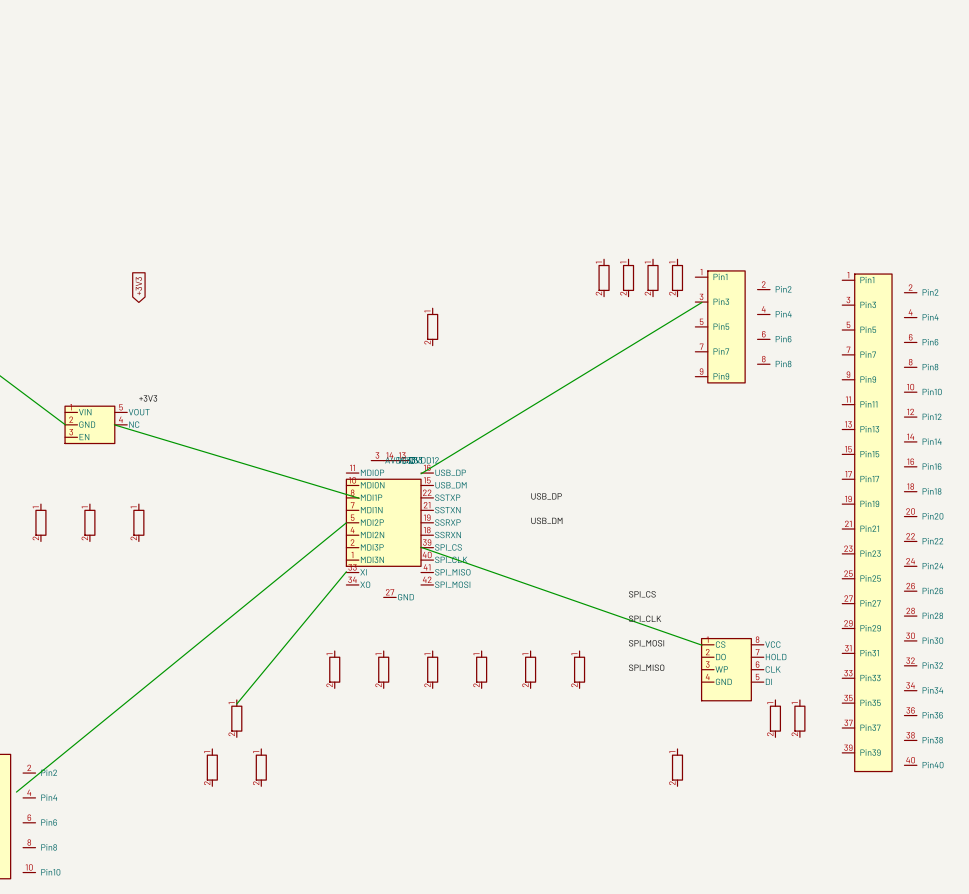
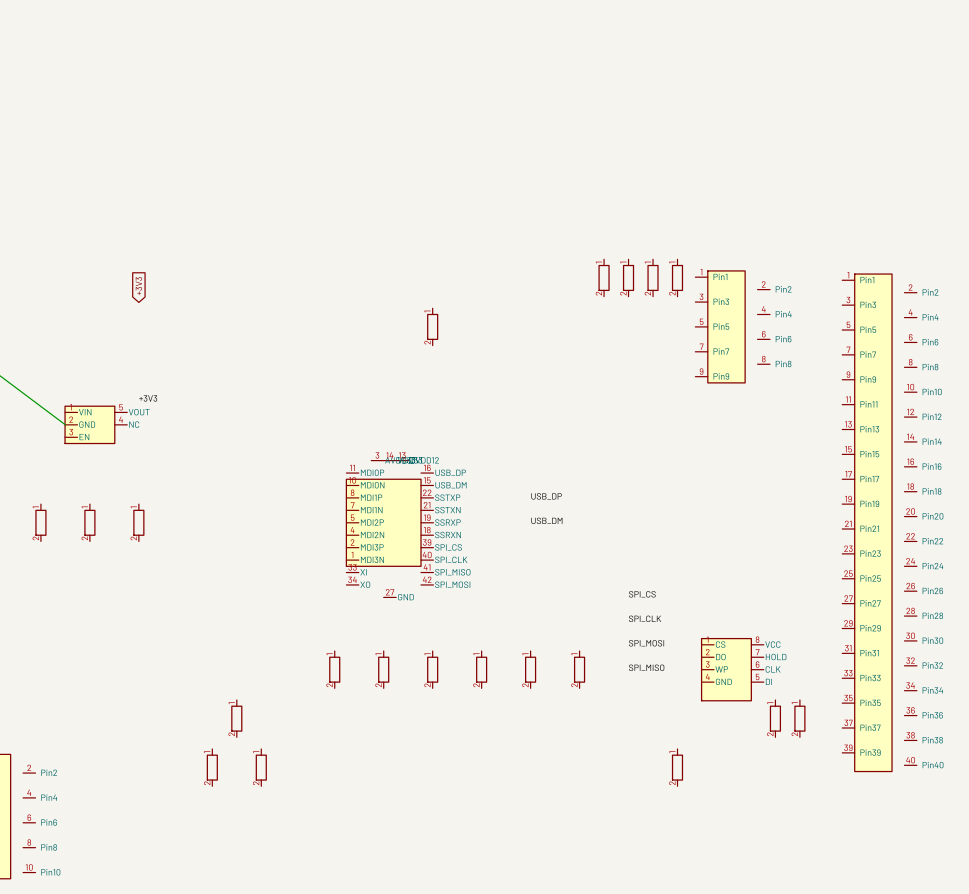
wire: (701, 302) (421, 473) -> none
wire: (114, 424) (359, 498) -> none
wire: (346, 522) (16, 792) -> none
wire: (421, 547) (701, 645) -> none
wire: (346, 571) (236, 703) -> none

